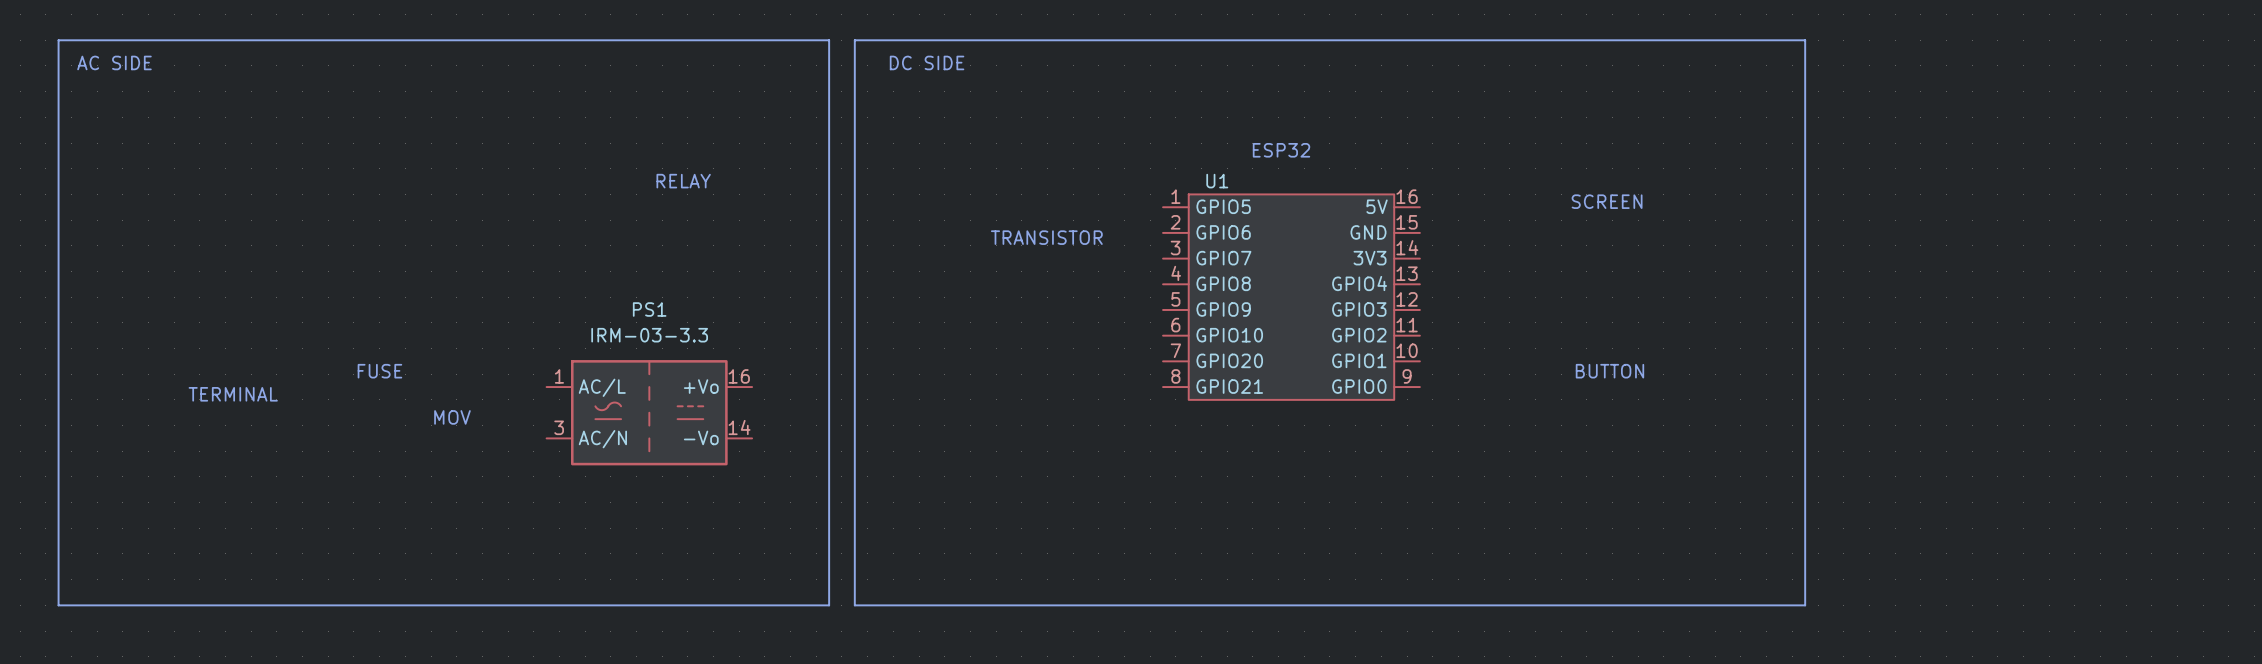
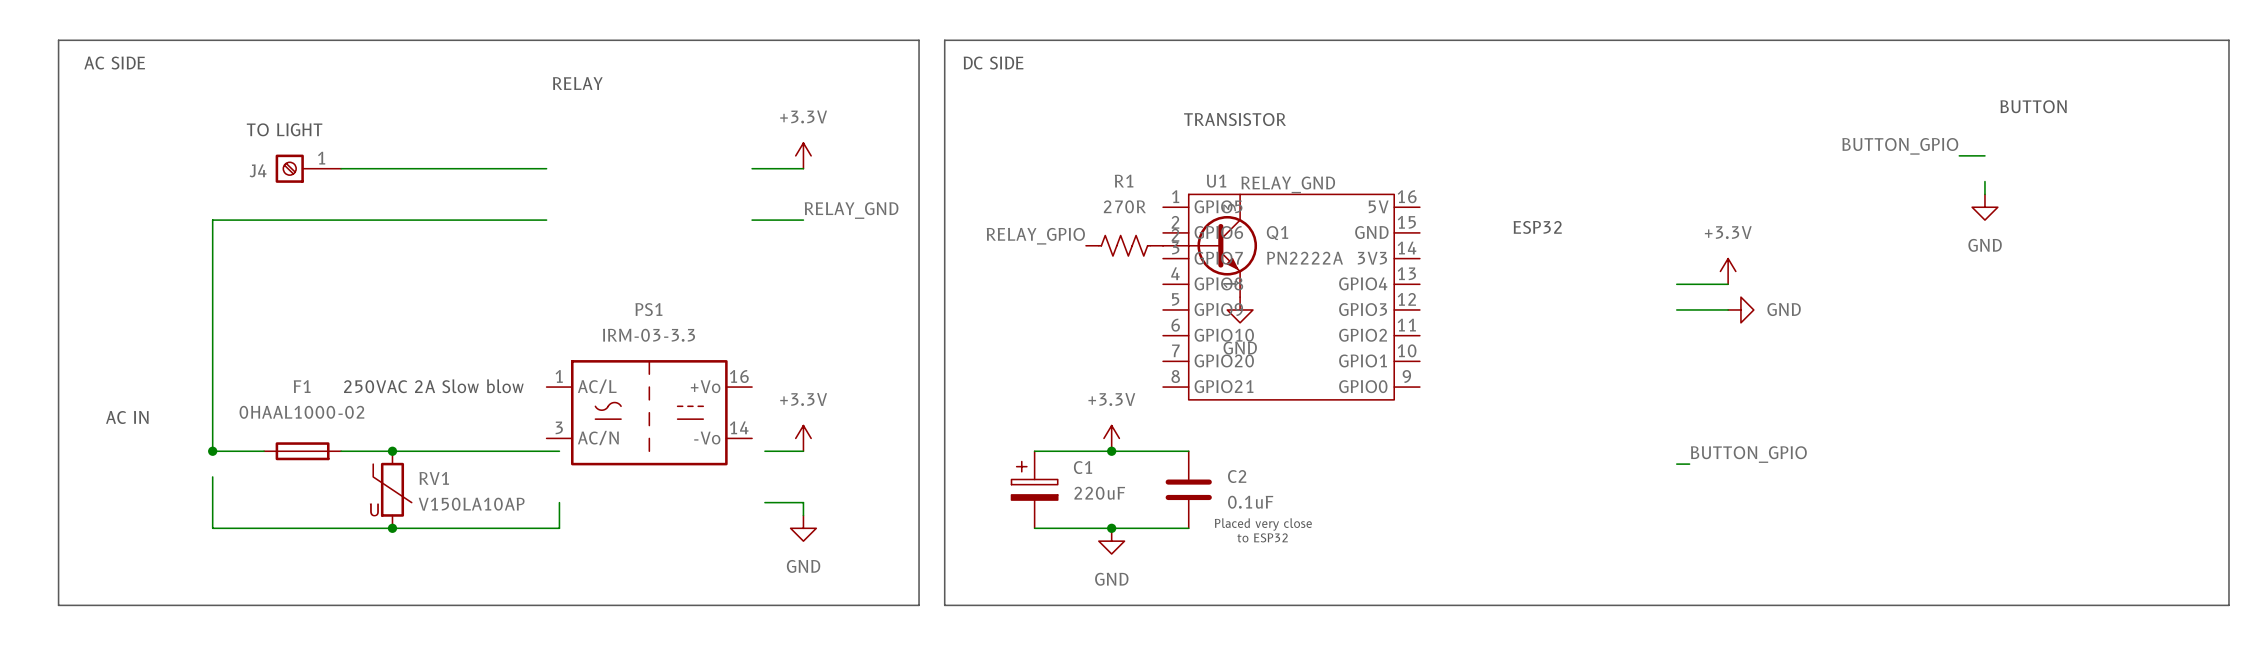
line: (829, 40) (829, 605) -> (829, 40) (854, 40)
line: (854, 40) (854, 605) -> (829, 605) (854, 605)
line: (919, 40) (944, 40) -> (919, 40) (919, 605)
line: (1805, 40) (1805, 605) -> (1805, 40) (2228, 40) (2228, 605) (1805, 605)
text position: DC SIDE (927, 62) -> DC SIDE (993, 63)
text: none -> BUTTON (2033, 106)
text: none -> TO LIGHT (284, 129)
label: none -> BUTTON_GPIO (1900, 146)
text: ESP32 (1281, 150) -> none
power symbol: none -> +3.3V (803, 155)
wire: none -> (1959, 155) (1984, 155)
J4: none -> (308, 168)
wire: none -> (341, 168) (546, 168)
wire: none -> (752, 168) (803, 168)
text position: RELAY (683, 181) -> RELAY (577, 83)
wire: none -> (1984, 181) (1984, 194)
label: none -> RELAY_GND (1288, 184)
text: SCREEN (1607, 201) -> none
power symbol: none -> GND (1984, 207)
label: none -> RELAY_GND (851, 210)
wire: none -> (546, 220) (212, 220) (212, 451) (264, 451)
wire: none -> (752, 220) (803, 220)
text: none -> ESP32 (1537, 227)
label: none -> RELAY_GPIO (1035, 236)
text position: TRANSISTOR (1046, 237) -> TRANSISTOR (1235, 119)
R1: none -> 270R (1124, 245)
Q1: none -> PN2222A (1210, 245)
power symbol: none -> +3.3V (1728, 271)
wire: none -> (1676, 284) (1728, 284)
power symbol: none -> GND (1240, 309)
wire: none -> (1676, 309) (1728, 309)
power symbol: none -> GND (1740, 309)
text: FUSE (379, 371) -> none
text: BUTTON (1609, 371) -> none
text: none -> 250VAC 2A Slow blow (433, 386)
text: TERMINAL (233, 394) -> none
text: none -> AC IN (127, 417)
text: MOV (452, 417) -> none
power symbol: none -> +3.3V (803, 438)
power symbol: none -> +3.3V (1111, 438)
junction: none -> (212, 451)
F1: none -> 0HAAL1000-02 (302, 451)
wire: none -> (341, 451) (559, 451)
junction: none -> (392, 451)
wire: none -> (764, 451) (803, 451)
wire: none -> (1034, 451) (1188, 451)
junction: none -> (1111, 451)
label: none -> BUTTON_GPIO (1748, 454)
wire: none -> (1676, 464) (1689, 464)
wire: none -> (212, 476) (212, 528) (559, 528) (559, 502)
RV1: none -> V150LA10AP (392, 489)
C1: none -> 220uF (1034, 489)
C2: none -> 0.1uF (1188, 489)
wire: none -> (764, 502) (803, 502) (803, 515)
text: none -> Placed very close (1263, 524)
junction: none -> (392, 528)
power symbol: none -> GND (803, 528)
wire: none -> (1034, 528) (1188, 528)
junction: none -> (1111, 528)
text: none -> to ESP32 (1262, 537)
power symbol: none -> GND (1111, 541)
line: (919, 605) (944, 605) -> (944, 40) (944, 605)

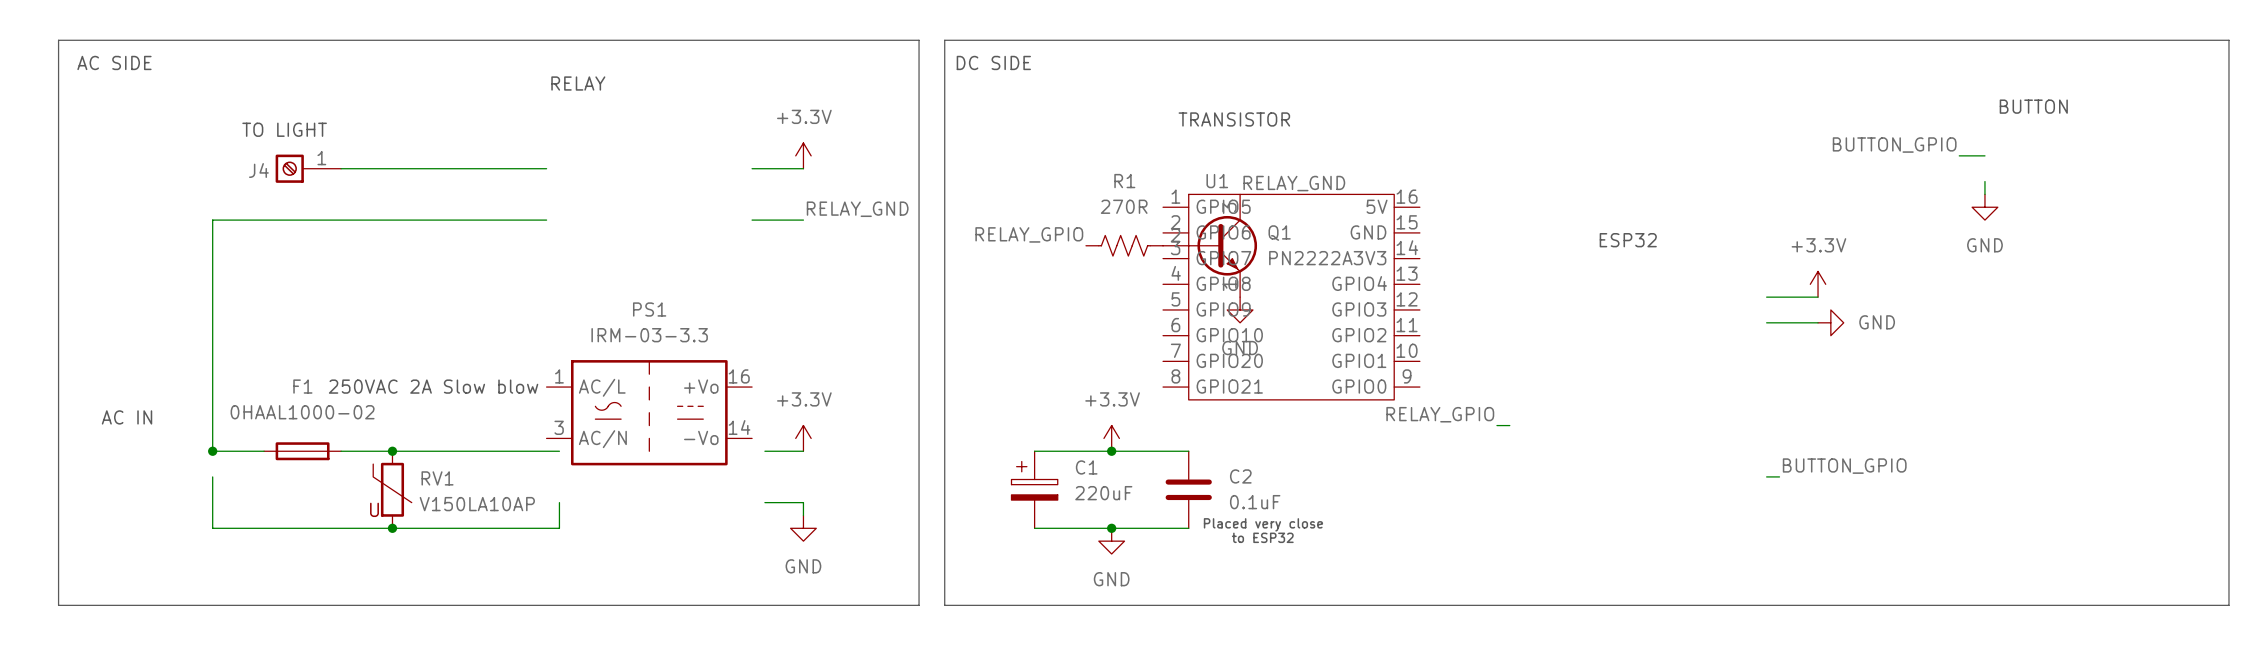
text position: ESP32 (1537, 227) -> ESP32 (1628, 240)
power symbol position: +3.3V (1728, 271) -> +3.3V (1818, 284)
wire: (1676, 284) (1728, 284) -> (1766, 297) (1818, 297)
wire: (1676, 309) (1728, 309) -> (1766, 322) (1818, 322)
power symbol position: GND (1740, 309) -> GND (1830, 322)
label: none -> RELAY_GPIO (1440, 414)
wire: none -> (1496, 425) (1509, 425)
label position: BUTTON_GPIO (1748, 454) -> BUTTON_GPIO (1844, 466)
wire: (1676, 464) (1689, 464) -> (1766, 476) (1779, 476)

